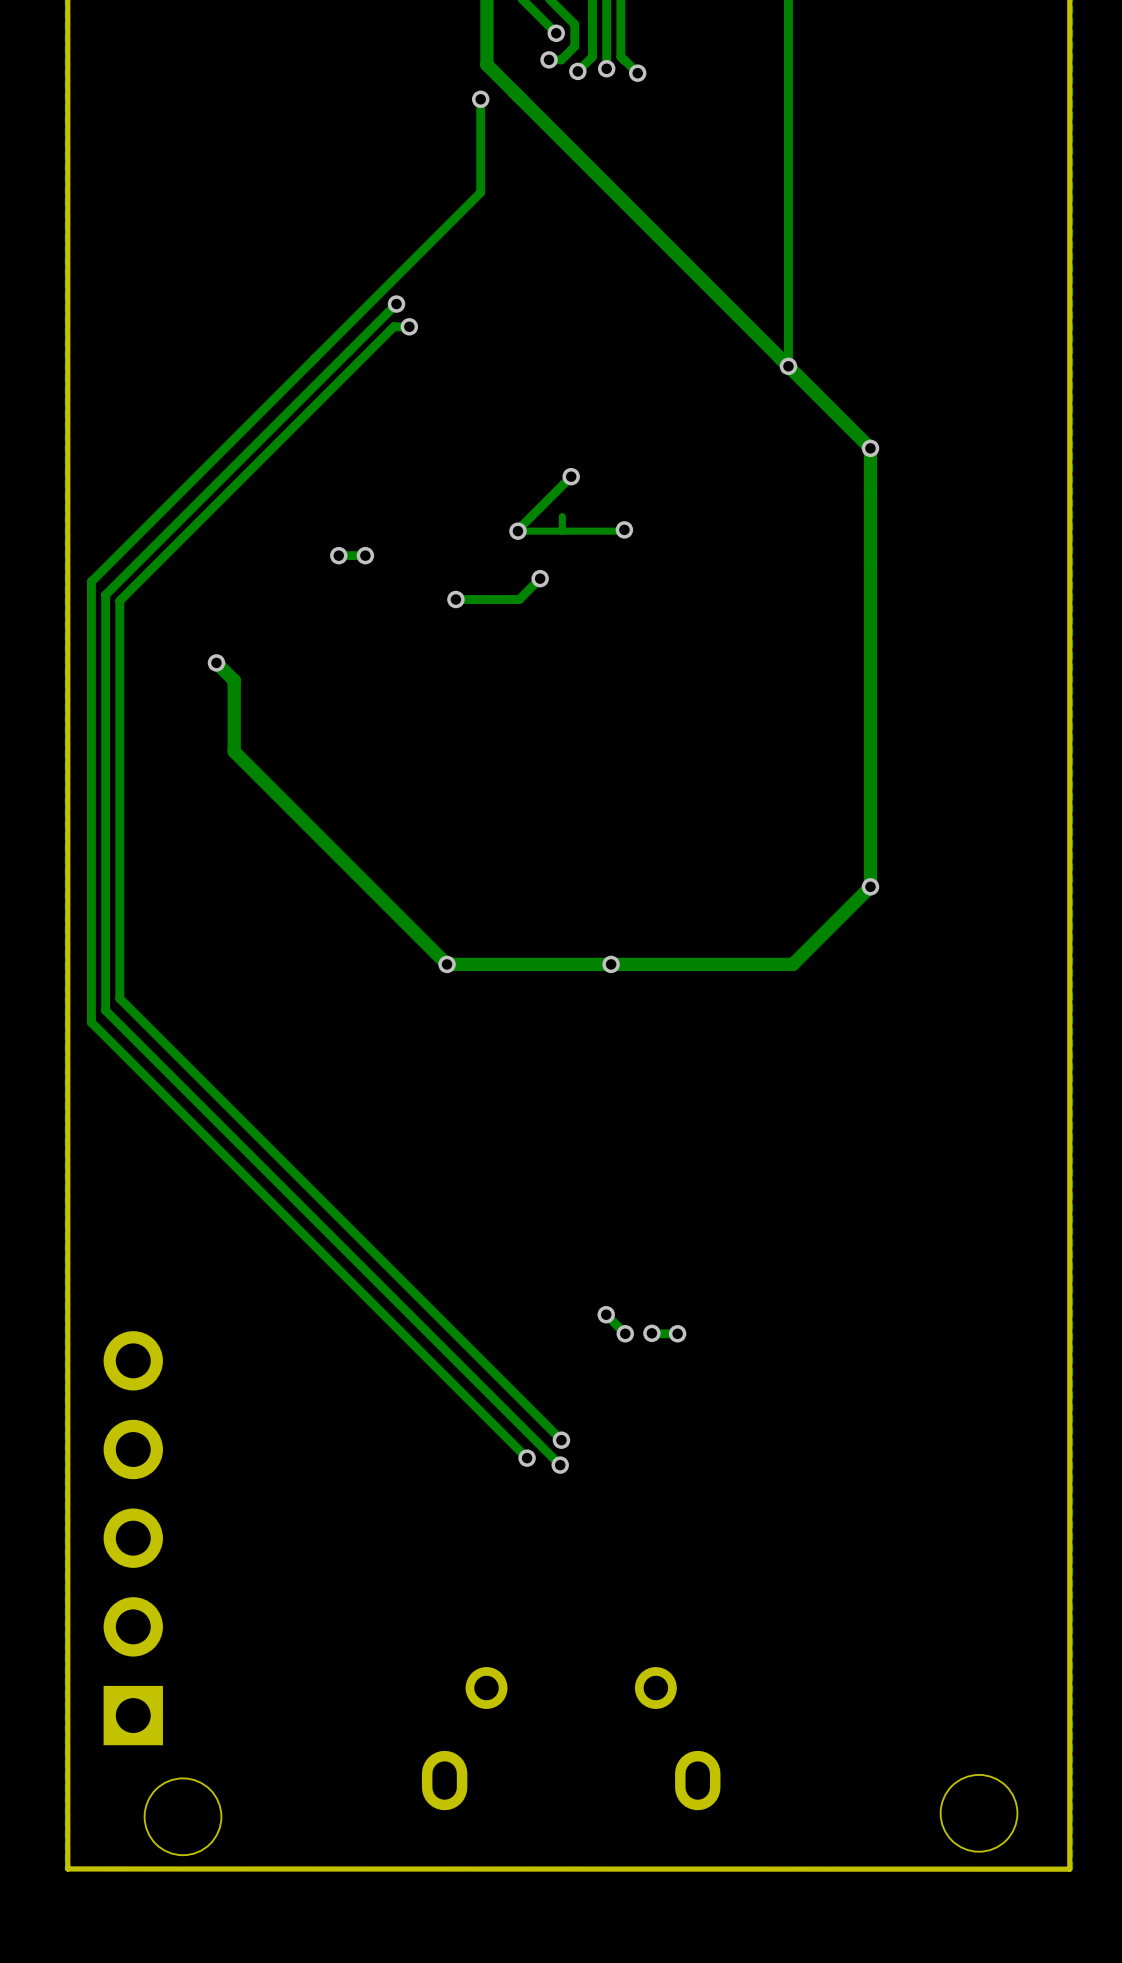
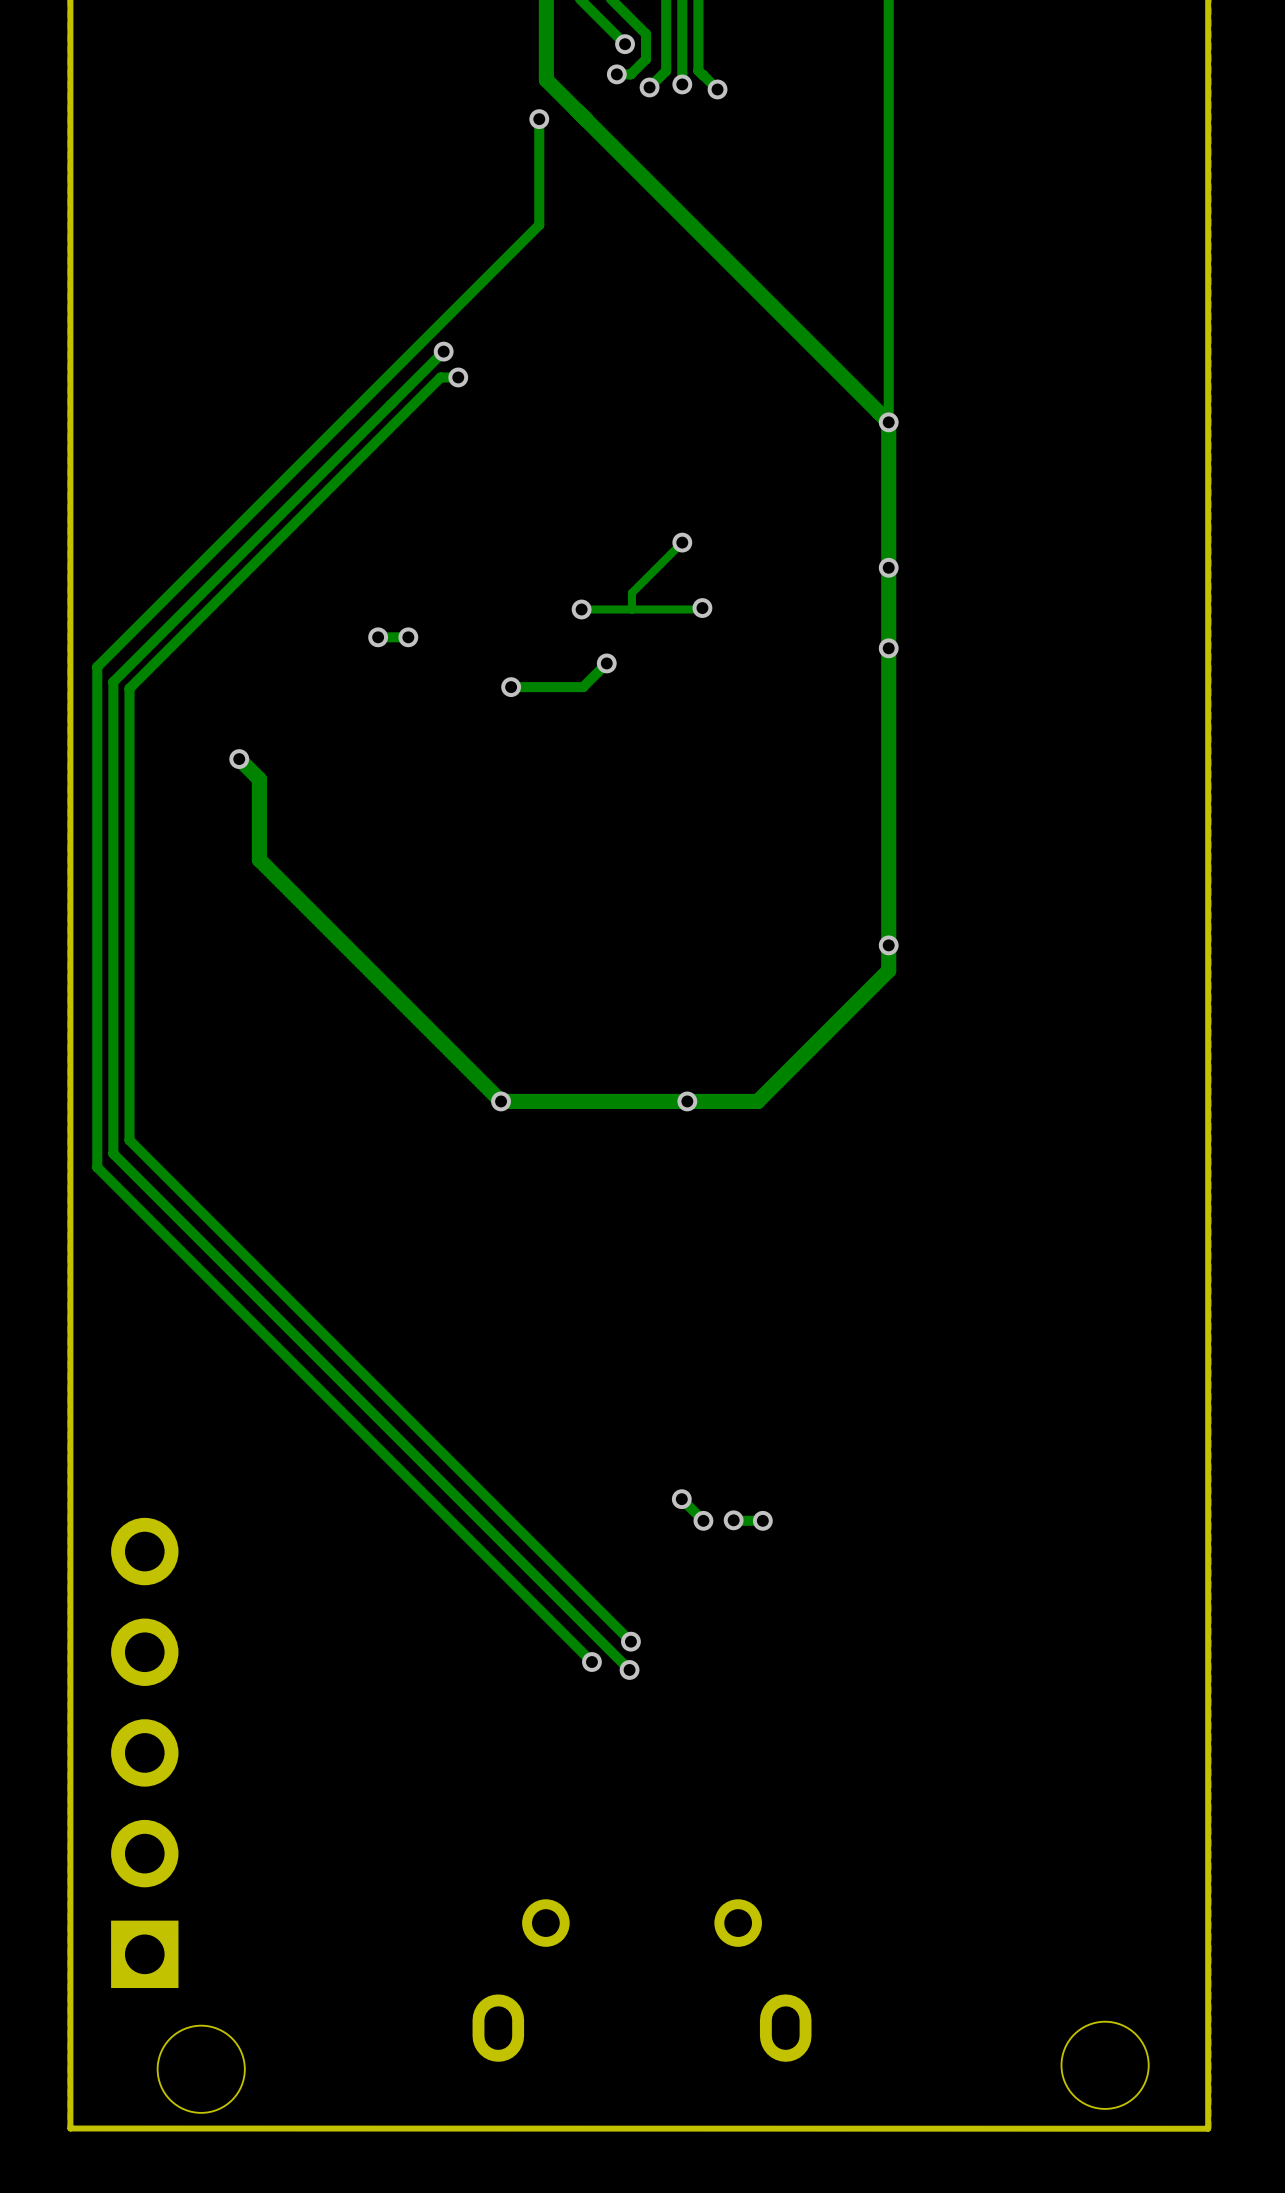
track: (788, 366) (870, 448) (870, 886) (792, 964) (673, 964) -> (888, 422) (888, 970) (757, 1101)
via: (870, 448) -> none
track: none -> (682, 542) (631, 592)
track: (571, 476) (517, 531) -> none
via position: (571, 476) -> (682, 542)
via: none -> (888, 567)
via: none -> (888, 648)
via position: (870, 886) -> (888, 945)

